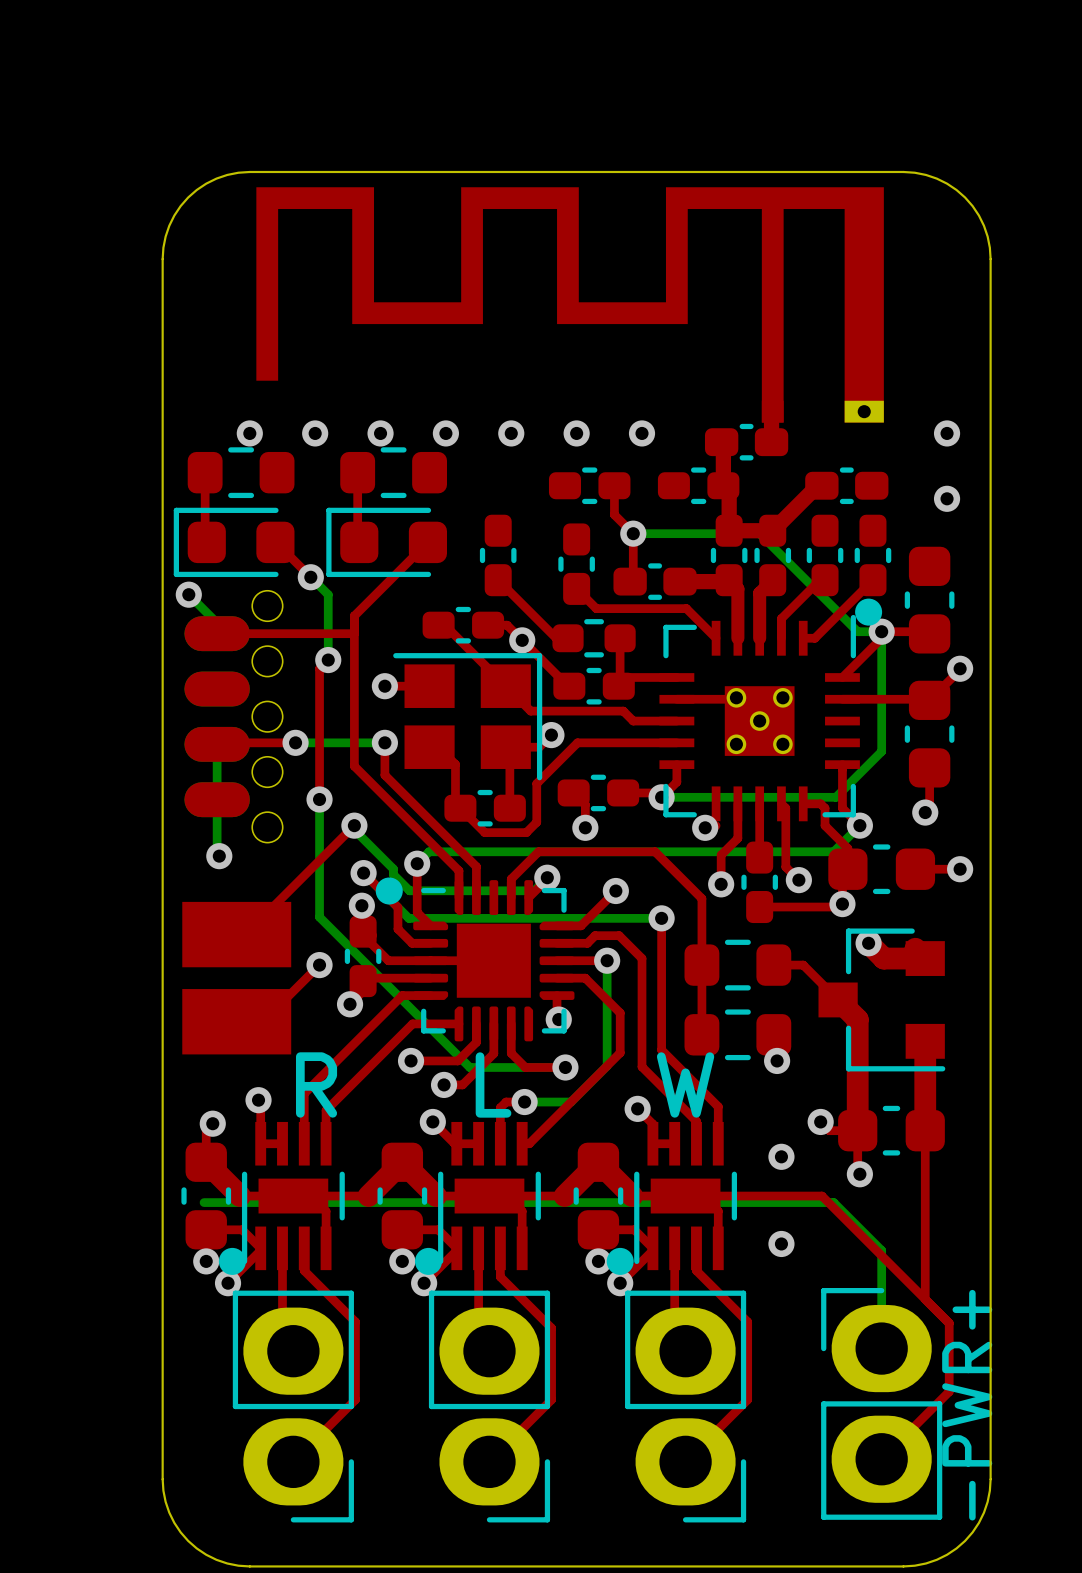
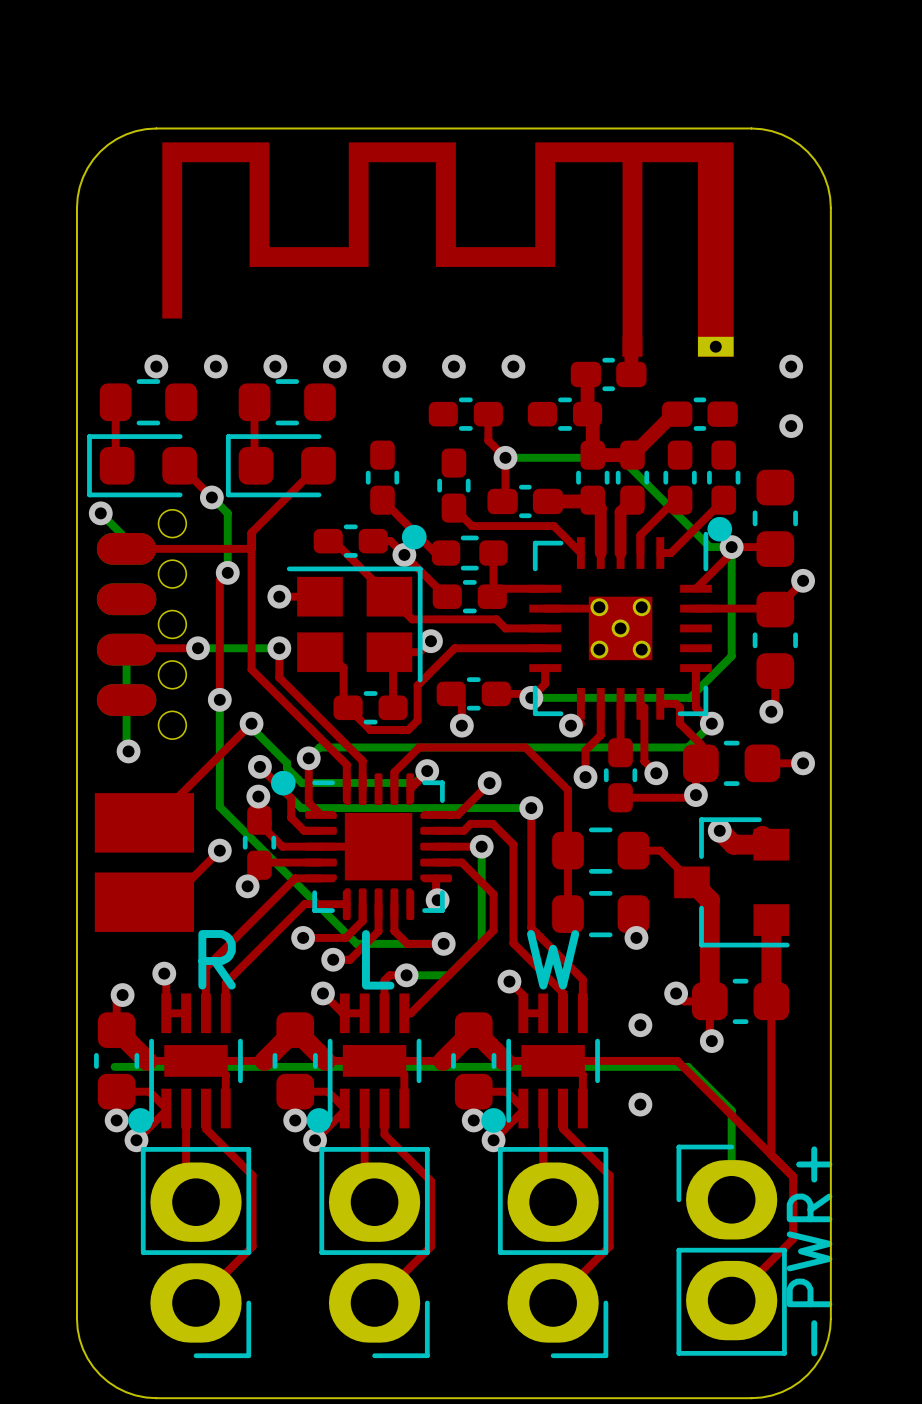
drawing: none -> [401, 524, 427, 550]

